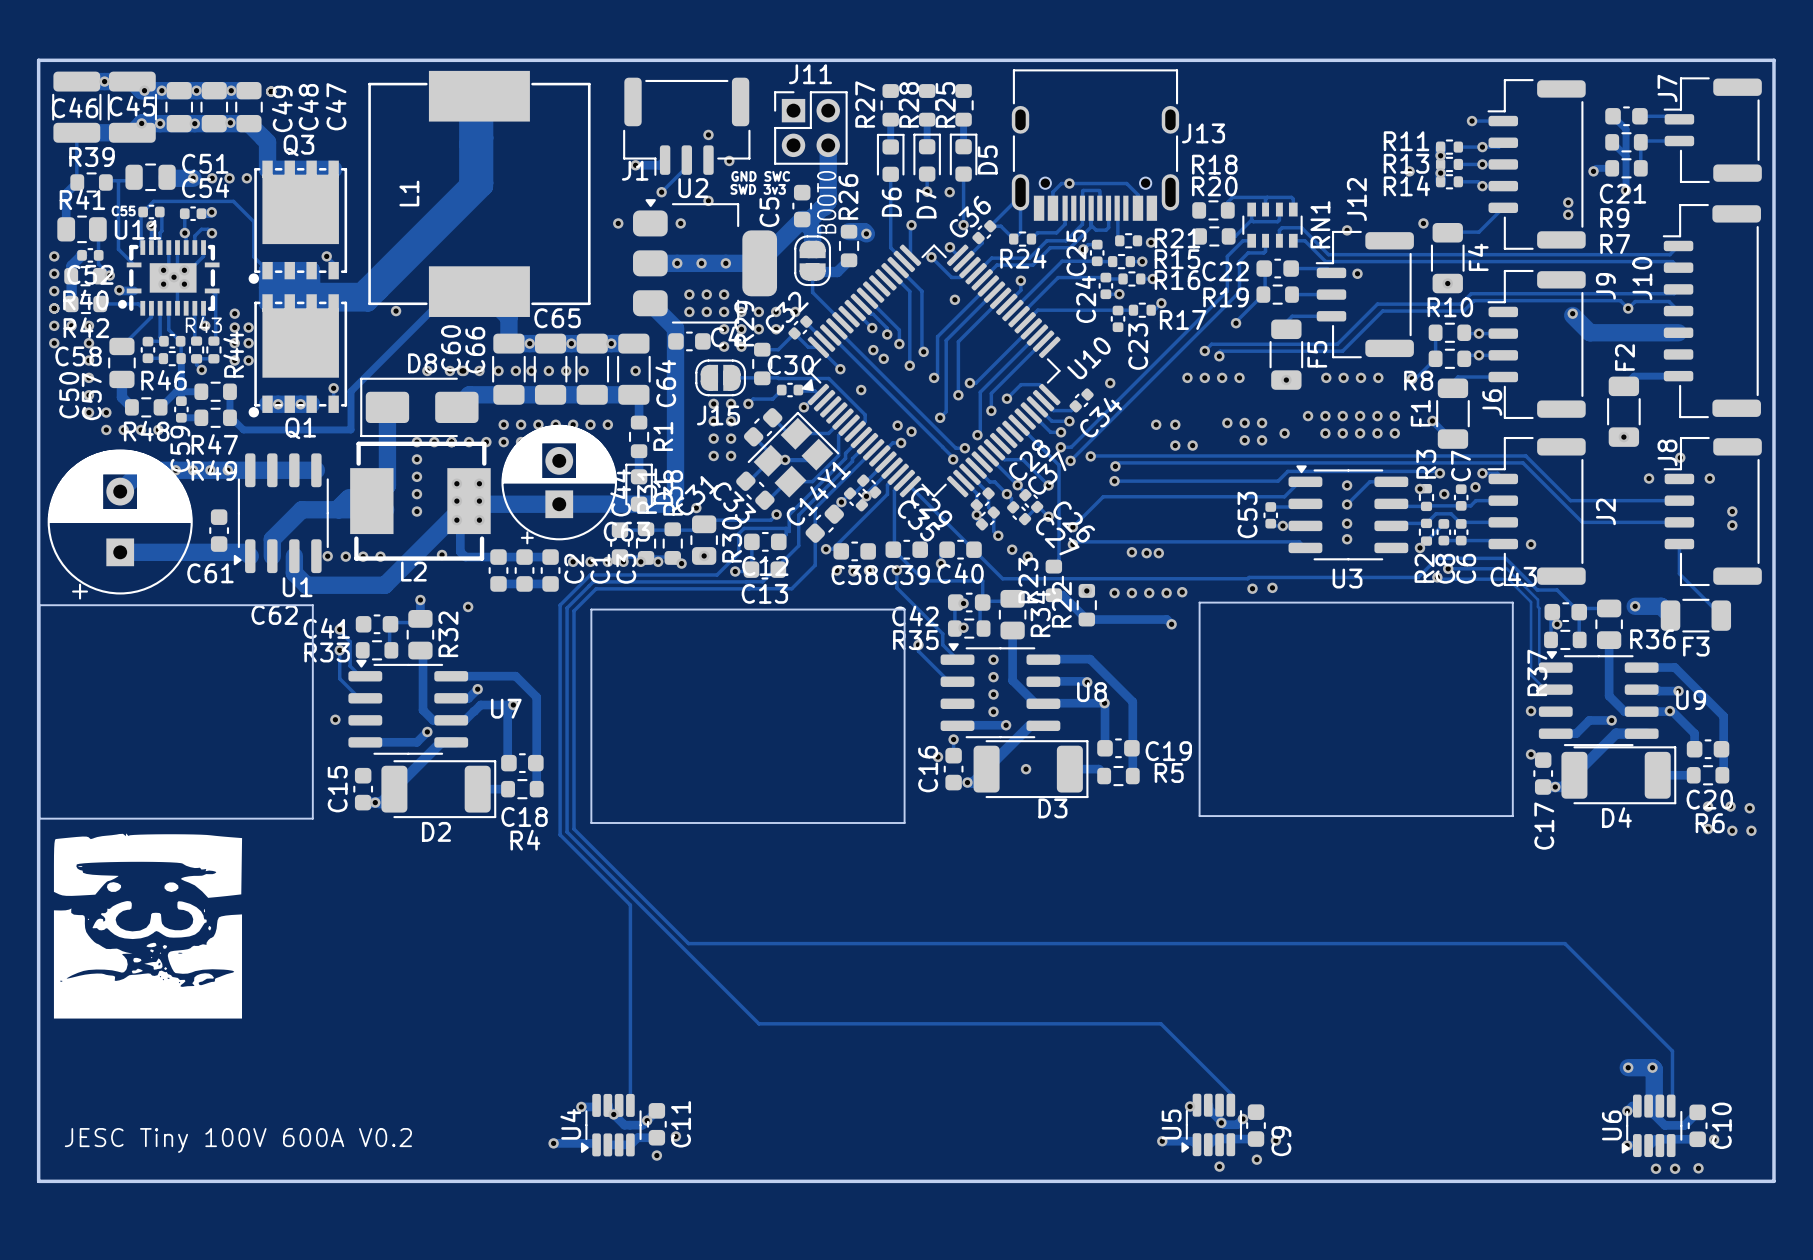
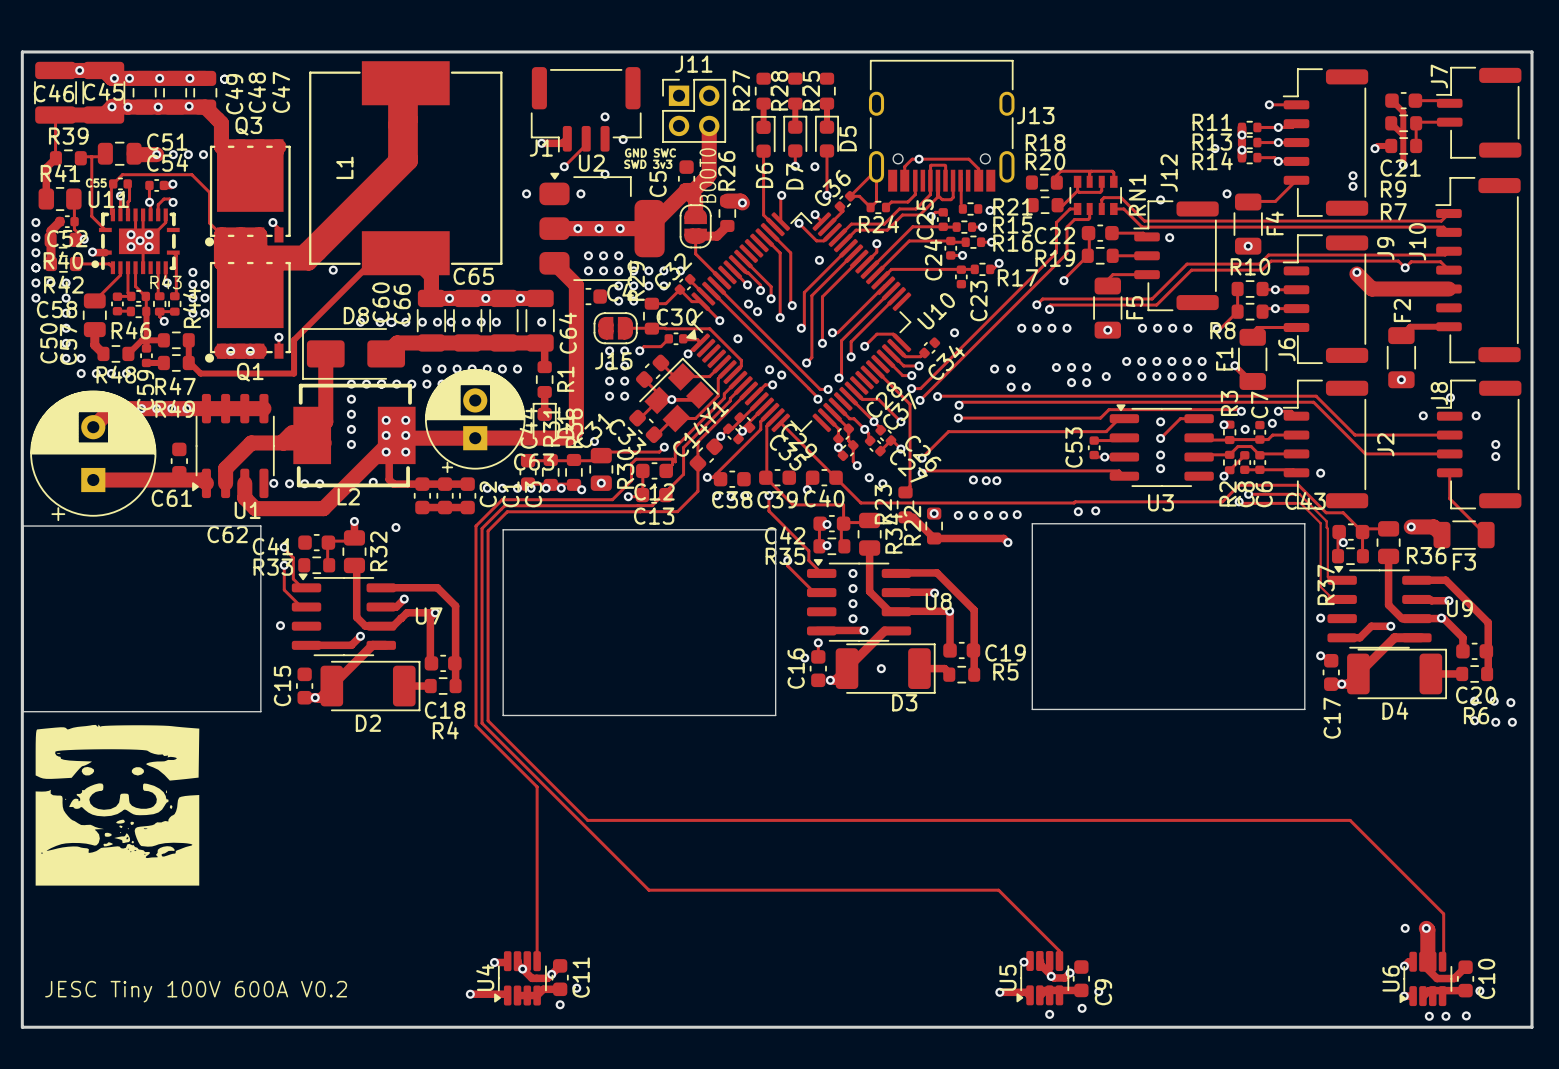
track: (1628, 1067) (1652, 1067) -> none

